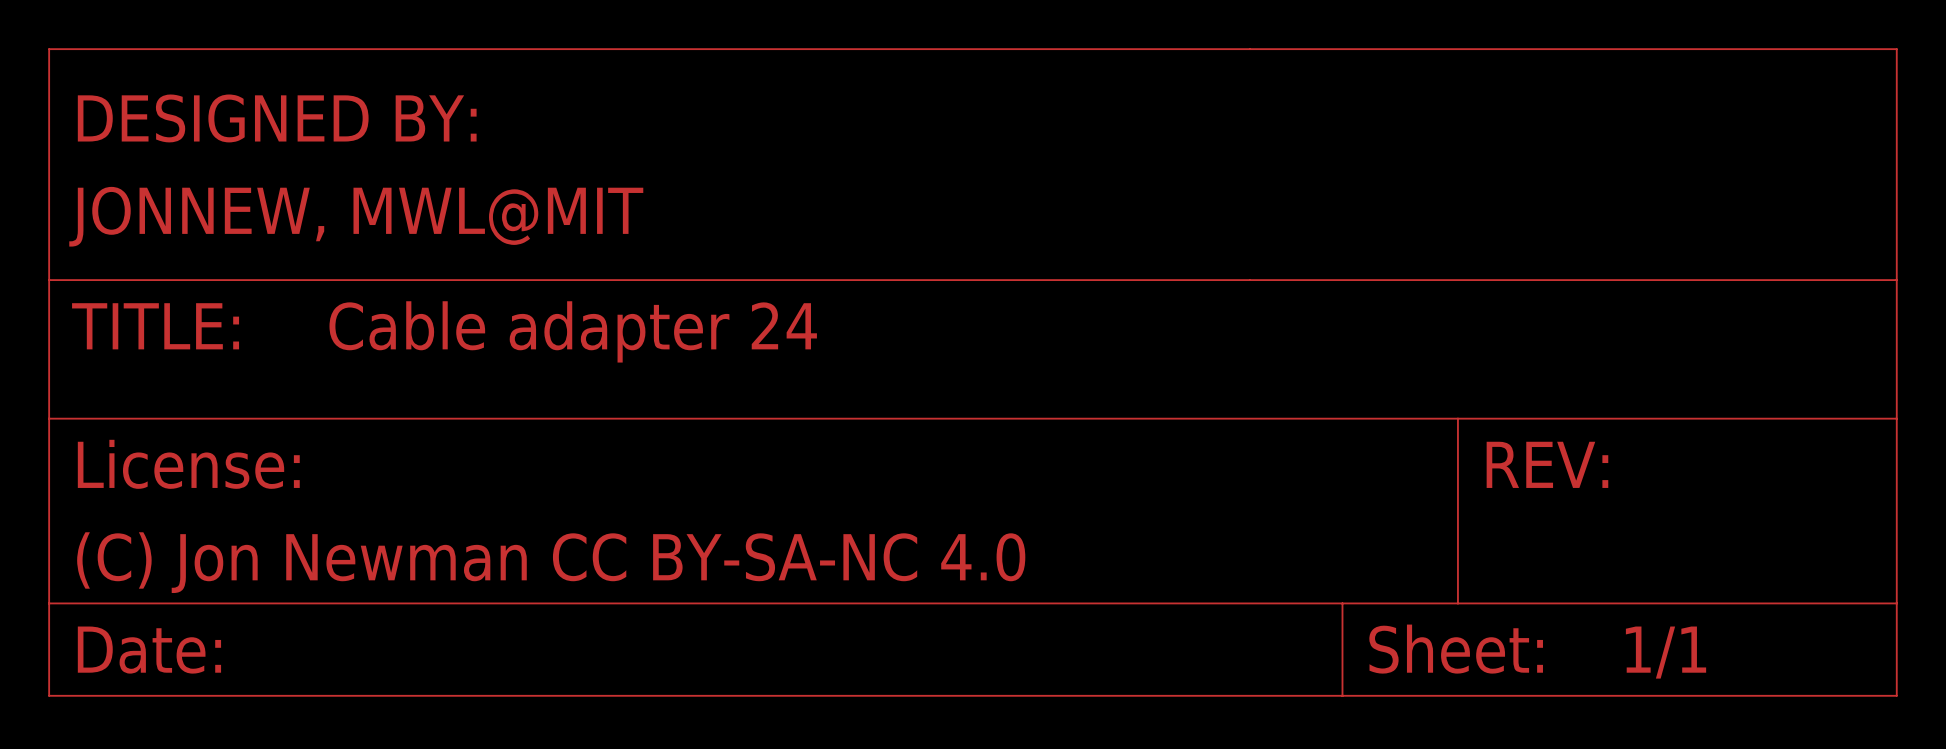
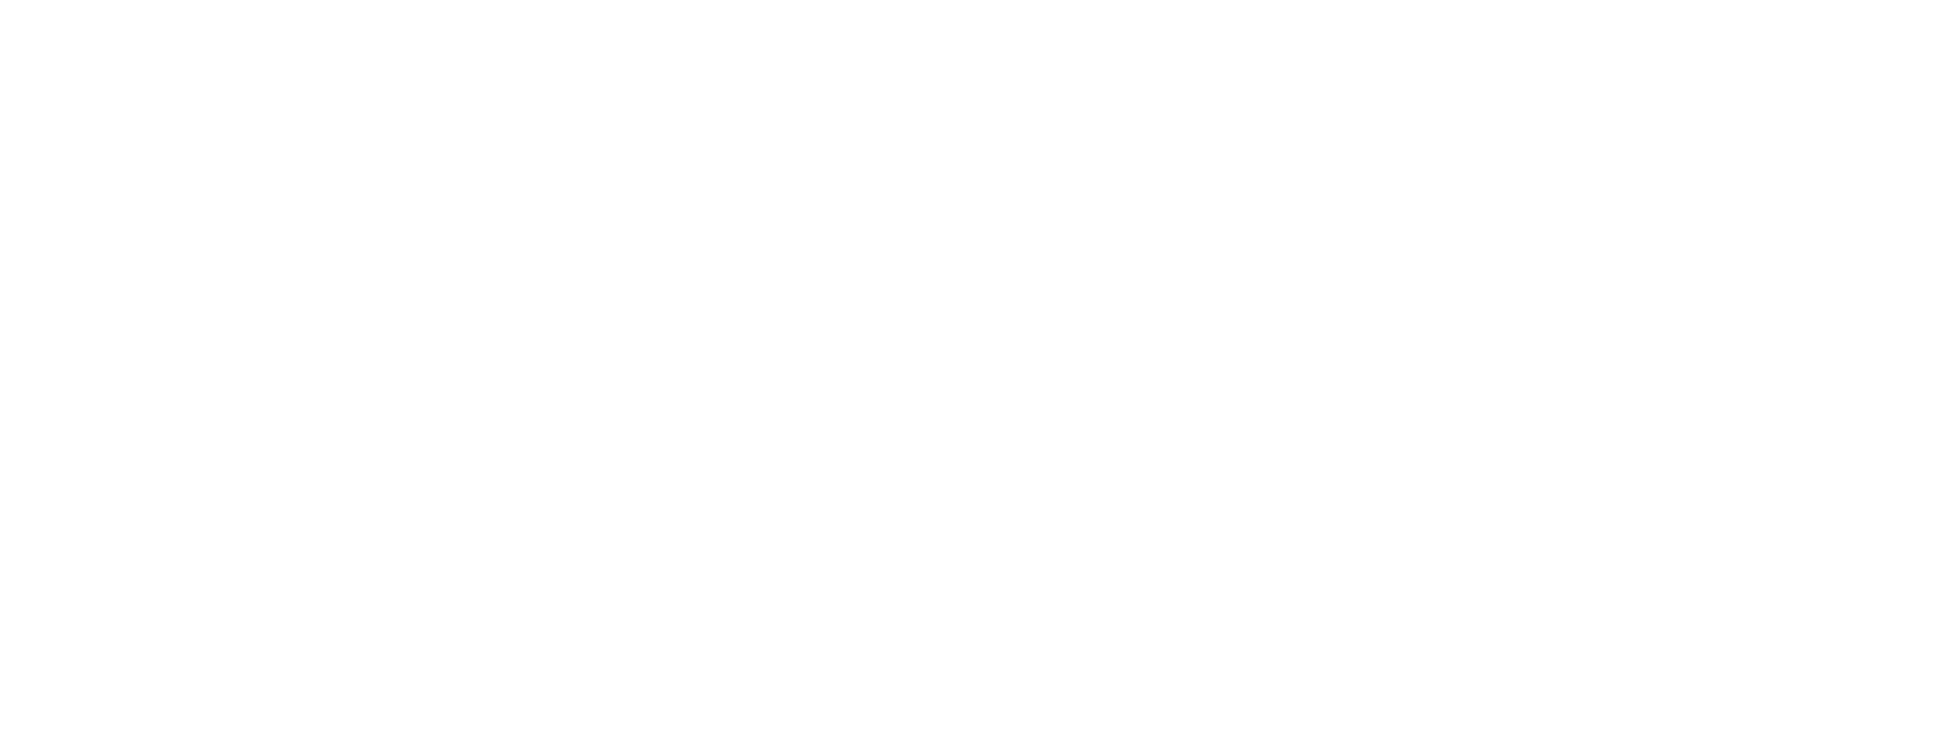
part: (972, 372) -> none

